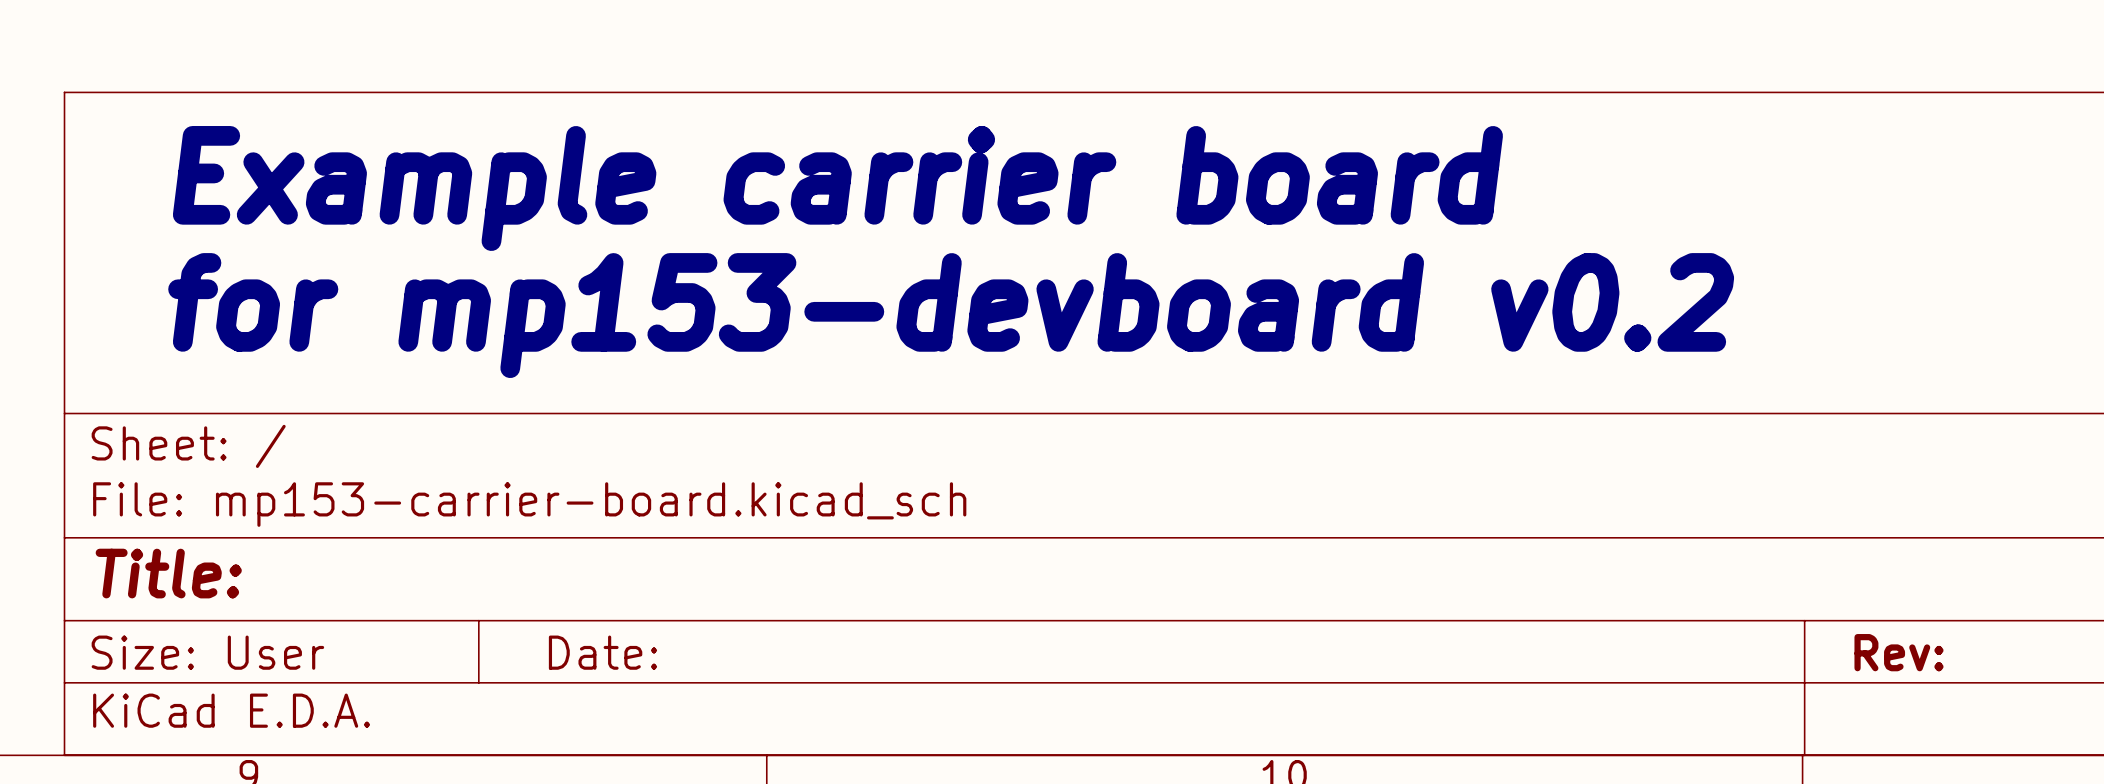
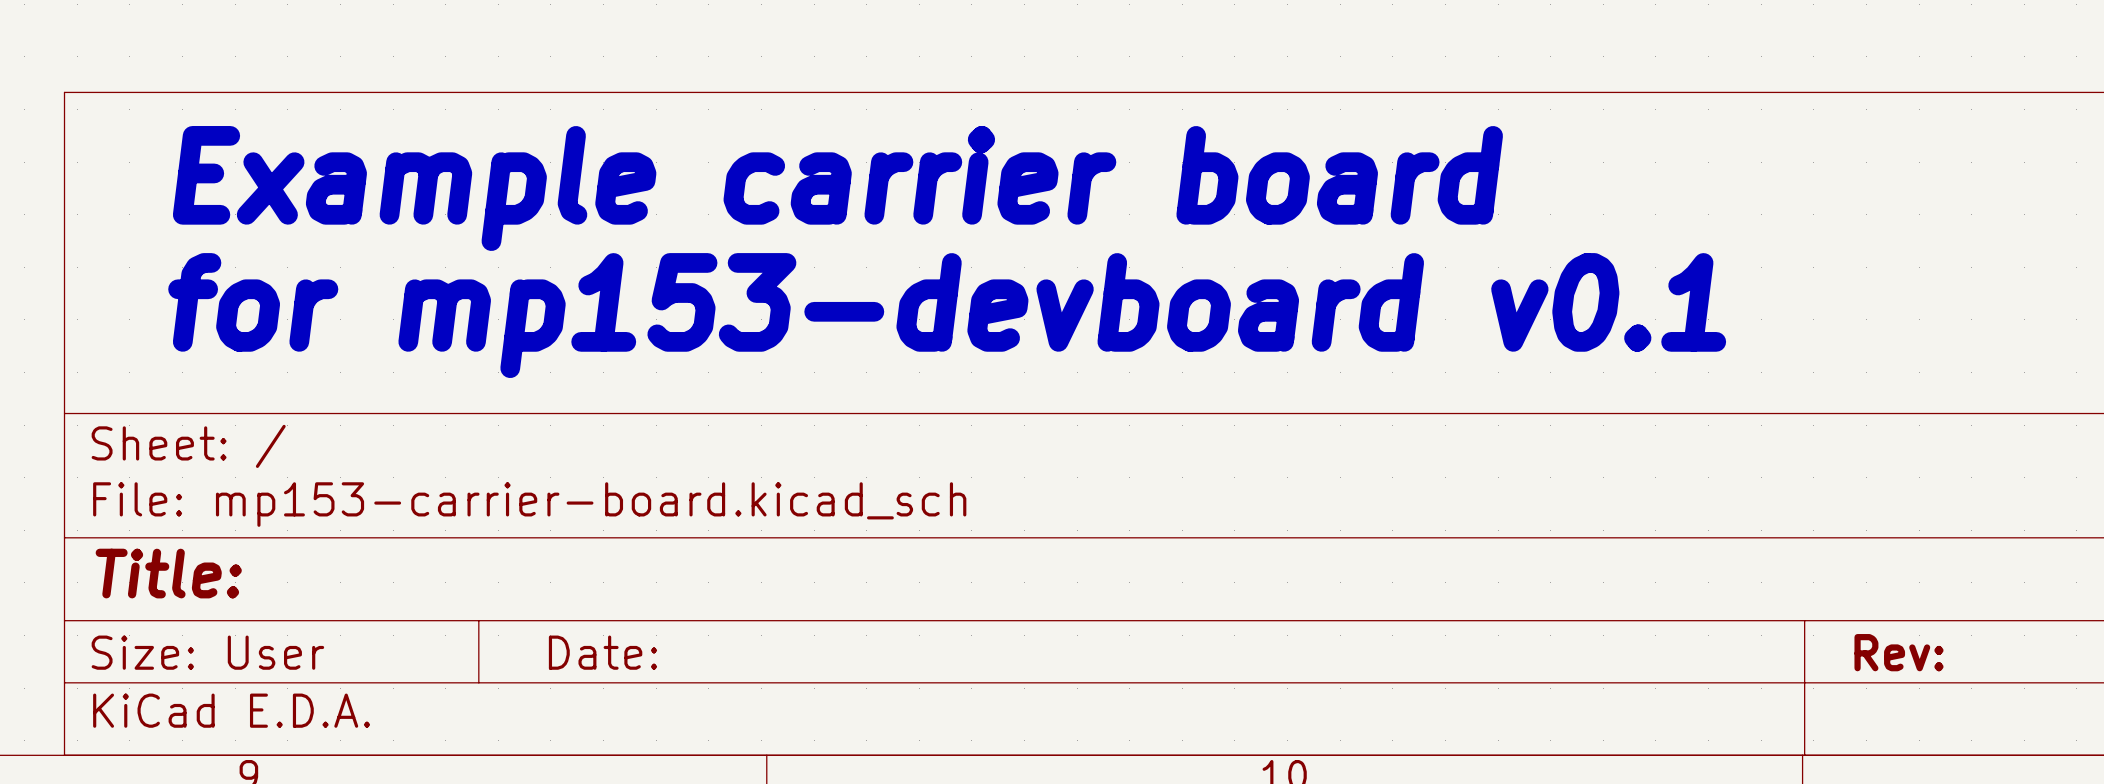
text: for mp153-devboard v0.2 (951, 315) -> for mp153-devboard v0.1 (947, 315)

